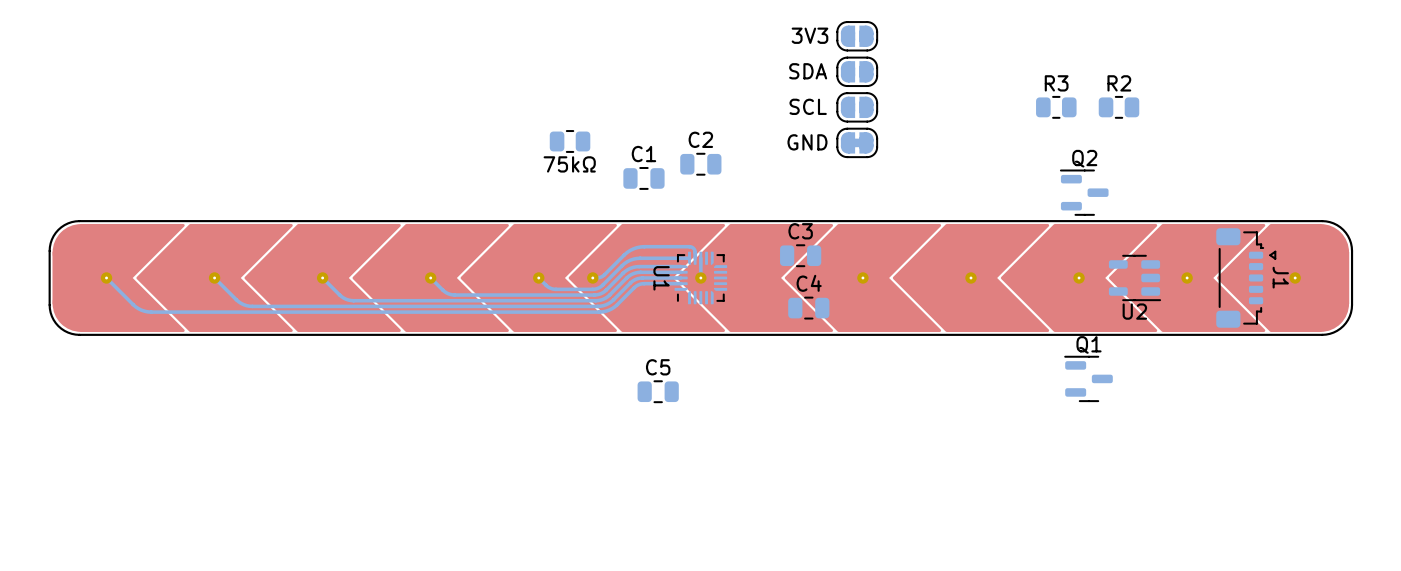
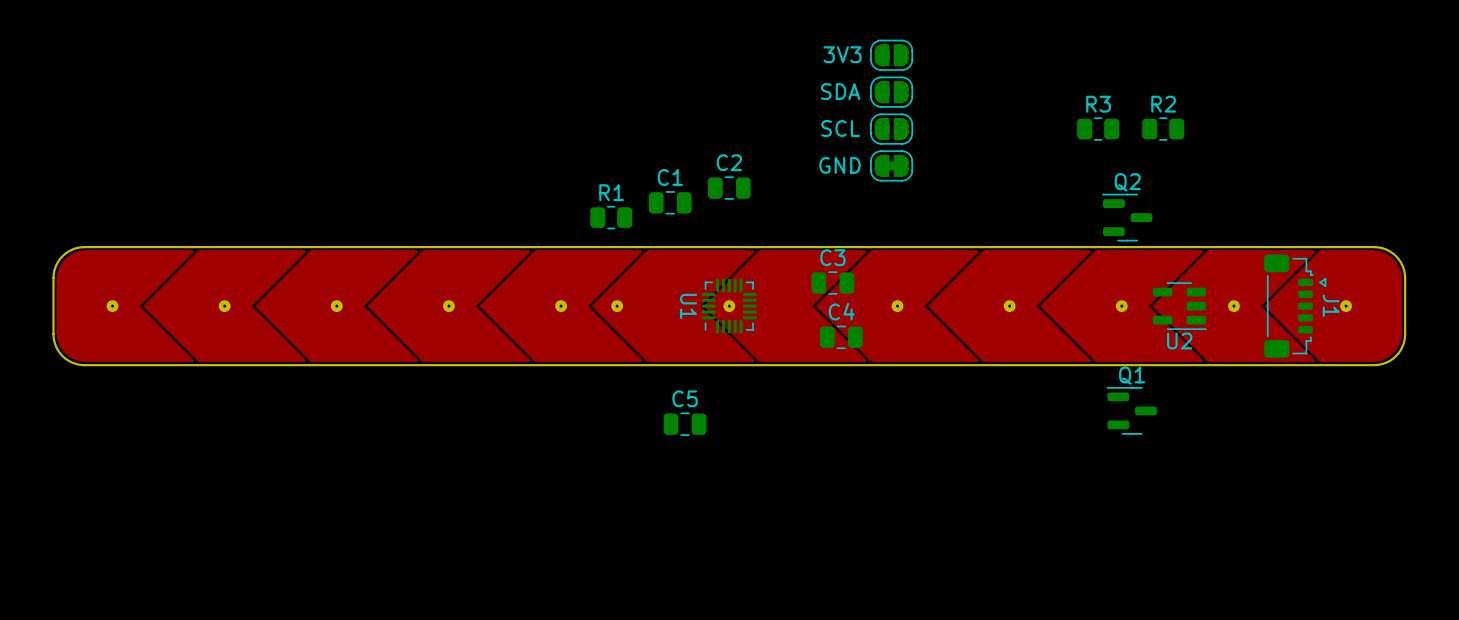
part: 75kΩ (570, 141) -> none
R1: none -> (611, 217)
bottom track: (689, 258) (633, 259) (624, 263) (601, 286) (593, 289) (553, 289) (538, 277) -> none
bottom track: (695, 258) (694, 250) (690, 246) (640, 246) (627, 252) (602, 276) (592, 277) -> none
bottom track: (700, 258) (700, 277) -> none
bottom track: (681, 266) (633, 267) (625, 271) (604, 291) (594, 295) (452, 294) (444, 291) (430, 277) -> none
bottom track: (681, 272) (635, 272) (628, 276) (607, 296) (595, 300) (351, 300) (341, 296) (322, 277) -> none
bottom track: (106, 277) (135, 306) (151, 312) (599, 312) (614, 306) (640, 284) (681, 283) -> none
bottom track: (681, 277) (635, 279) (611, 301) (597, 306) (249, 306) (238, 301) (214, 277) -> none

